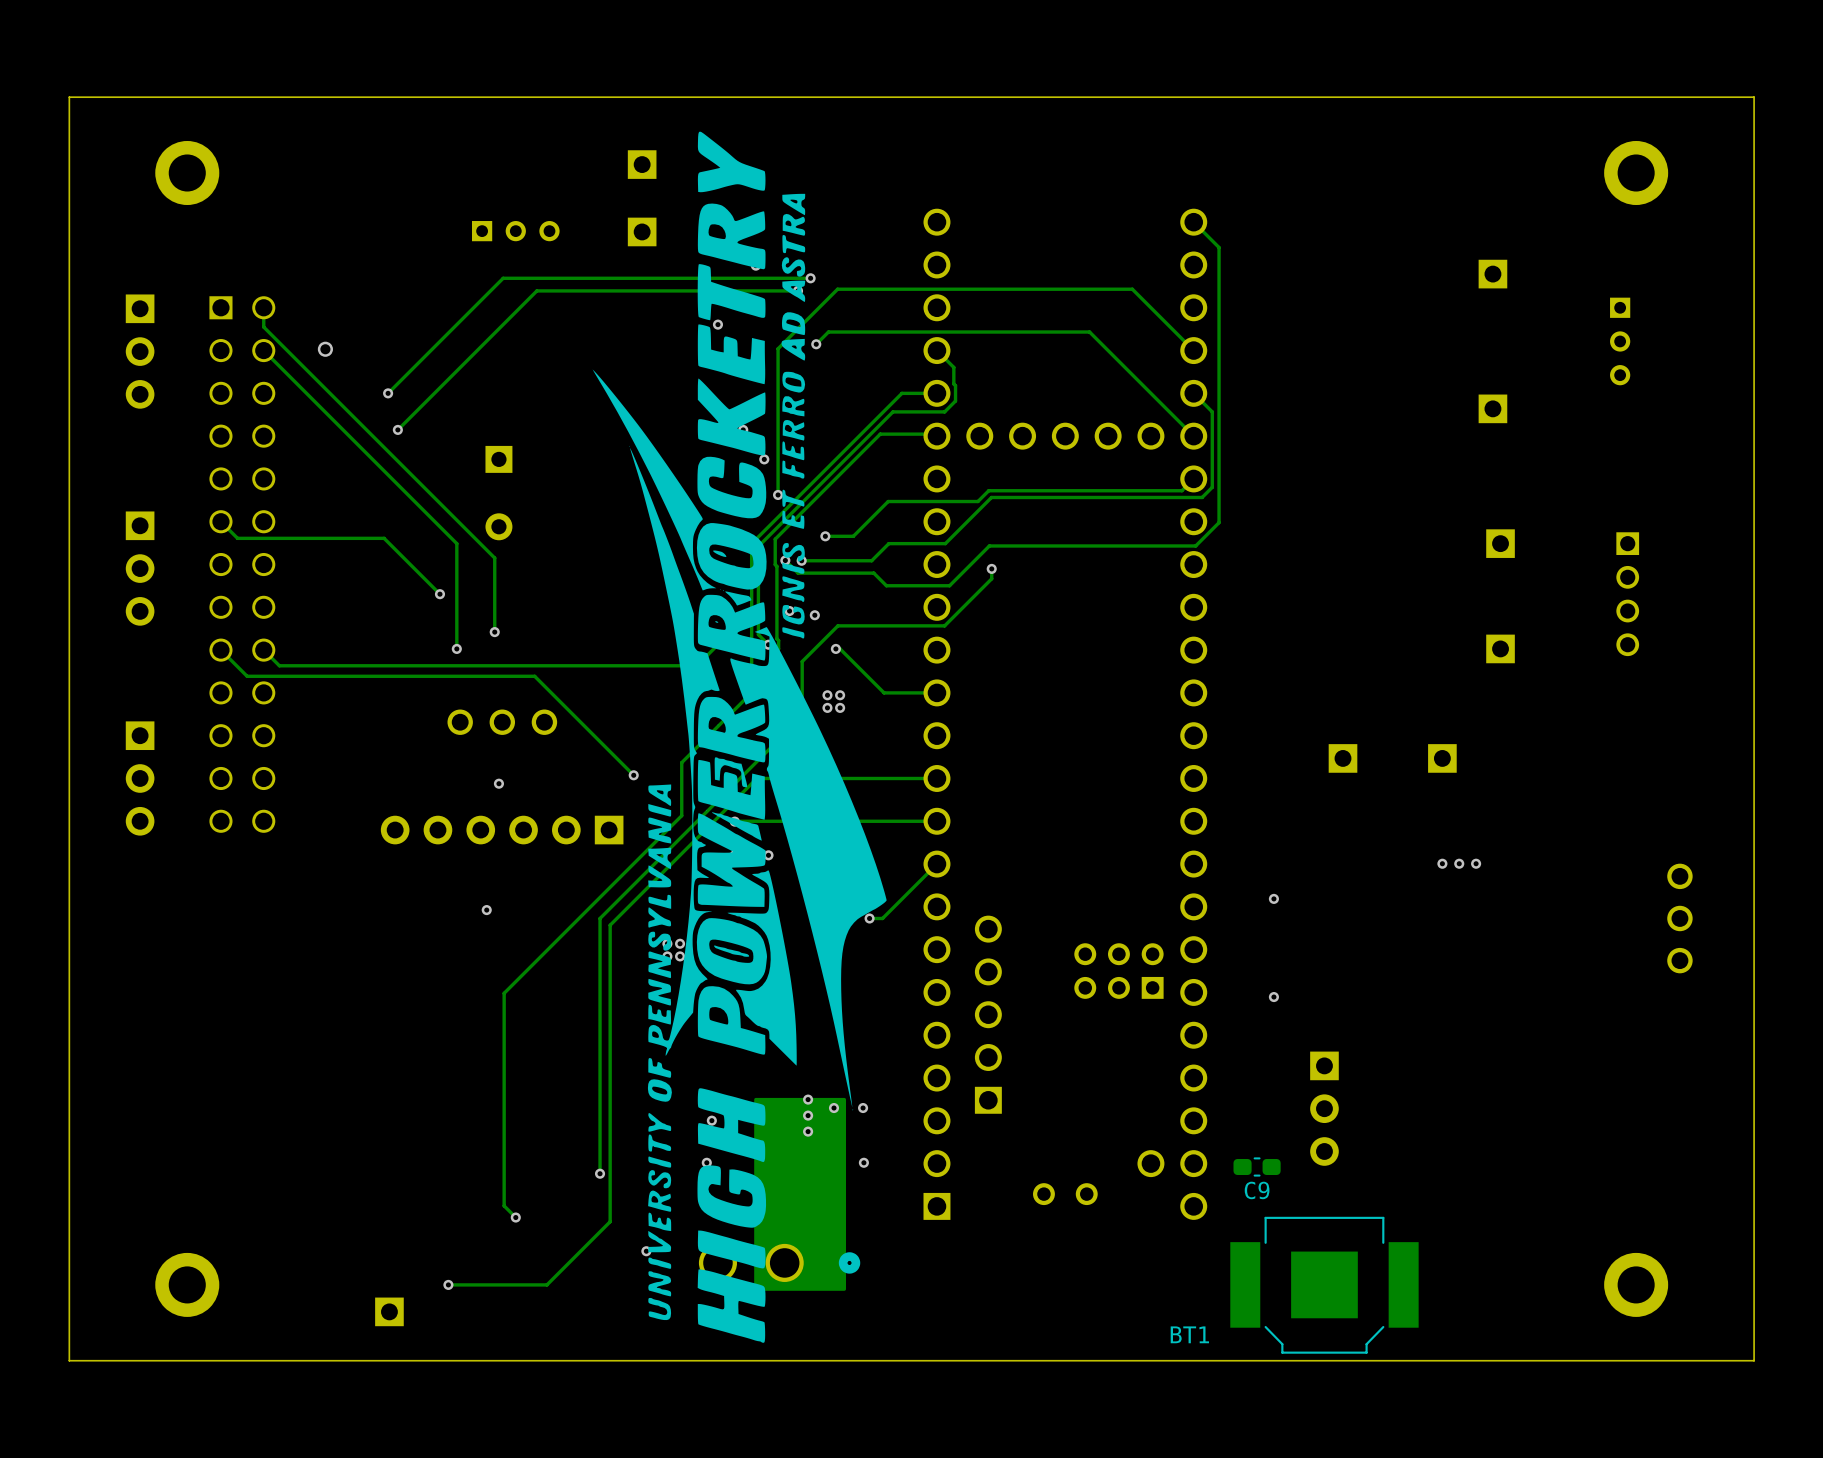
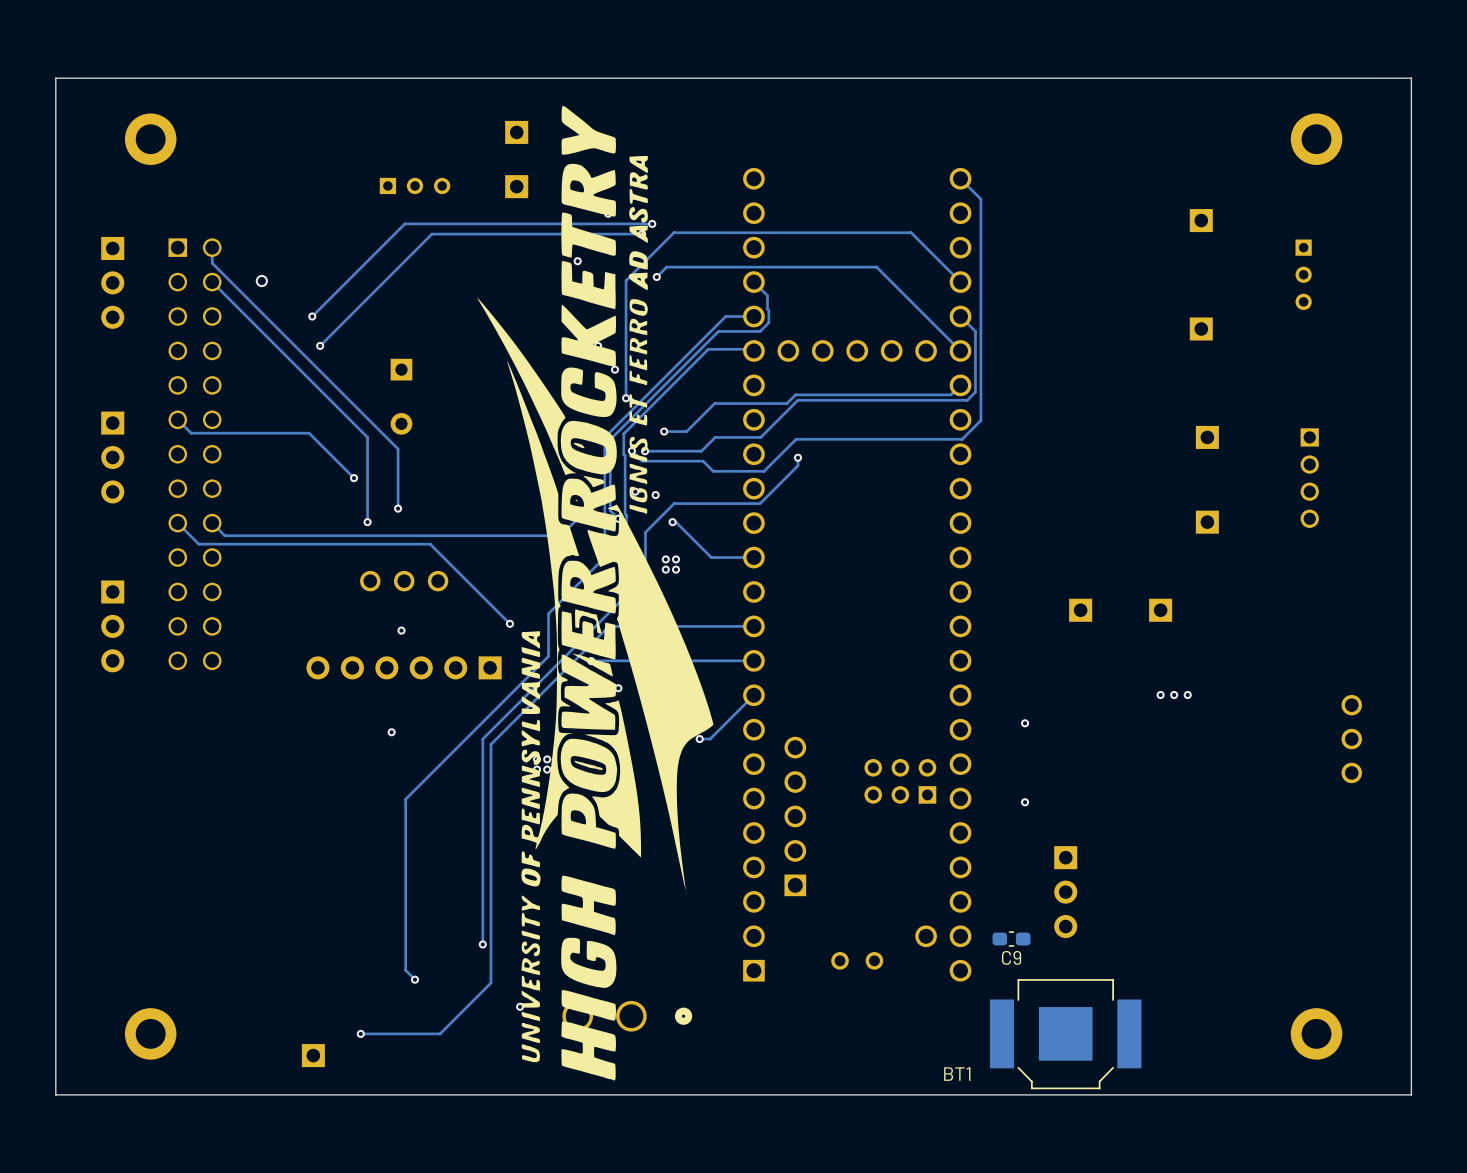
drawing: [754, 1097, 847, 1291] -> none
via: (808, 1099) -> none
via: (834, 1108) -> none
via: (863, 1108) -> none
via: (808, 1115) -> none
via: (711, 1120) -> none
via: (808, 1131) -> none
via: (706, 1162) -> none
via: (863, 1162) -> none

